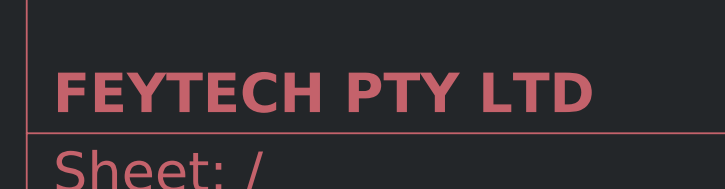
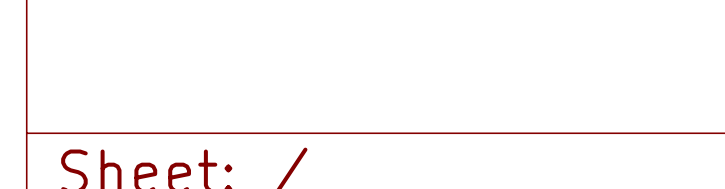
title block: FEYTECH PTY LTD (324, 92) -> none

